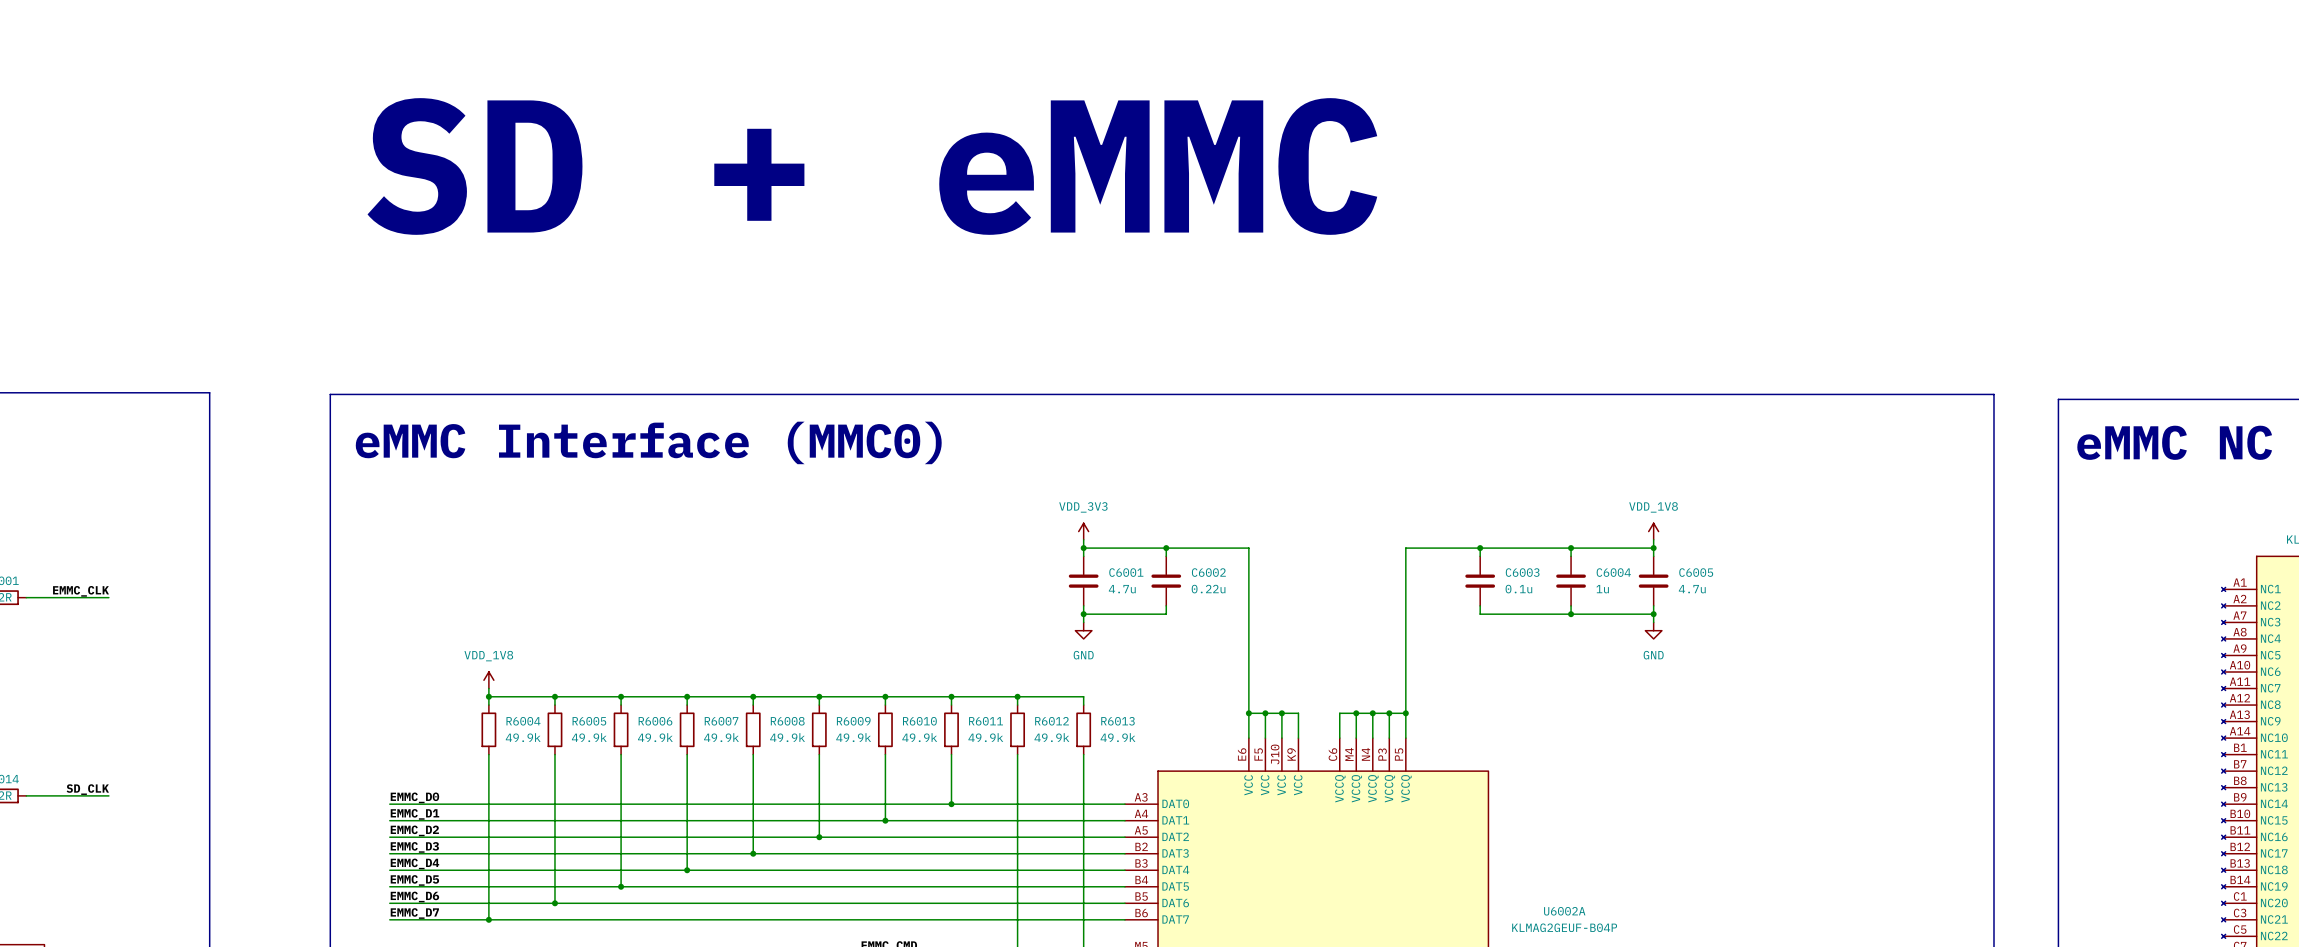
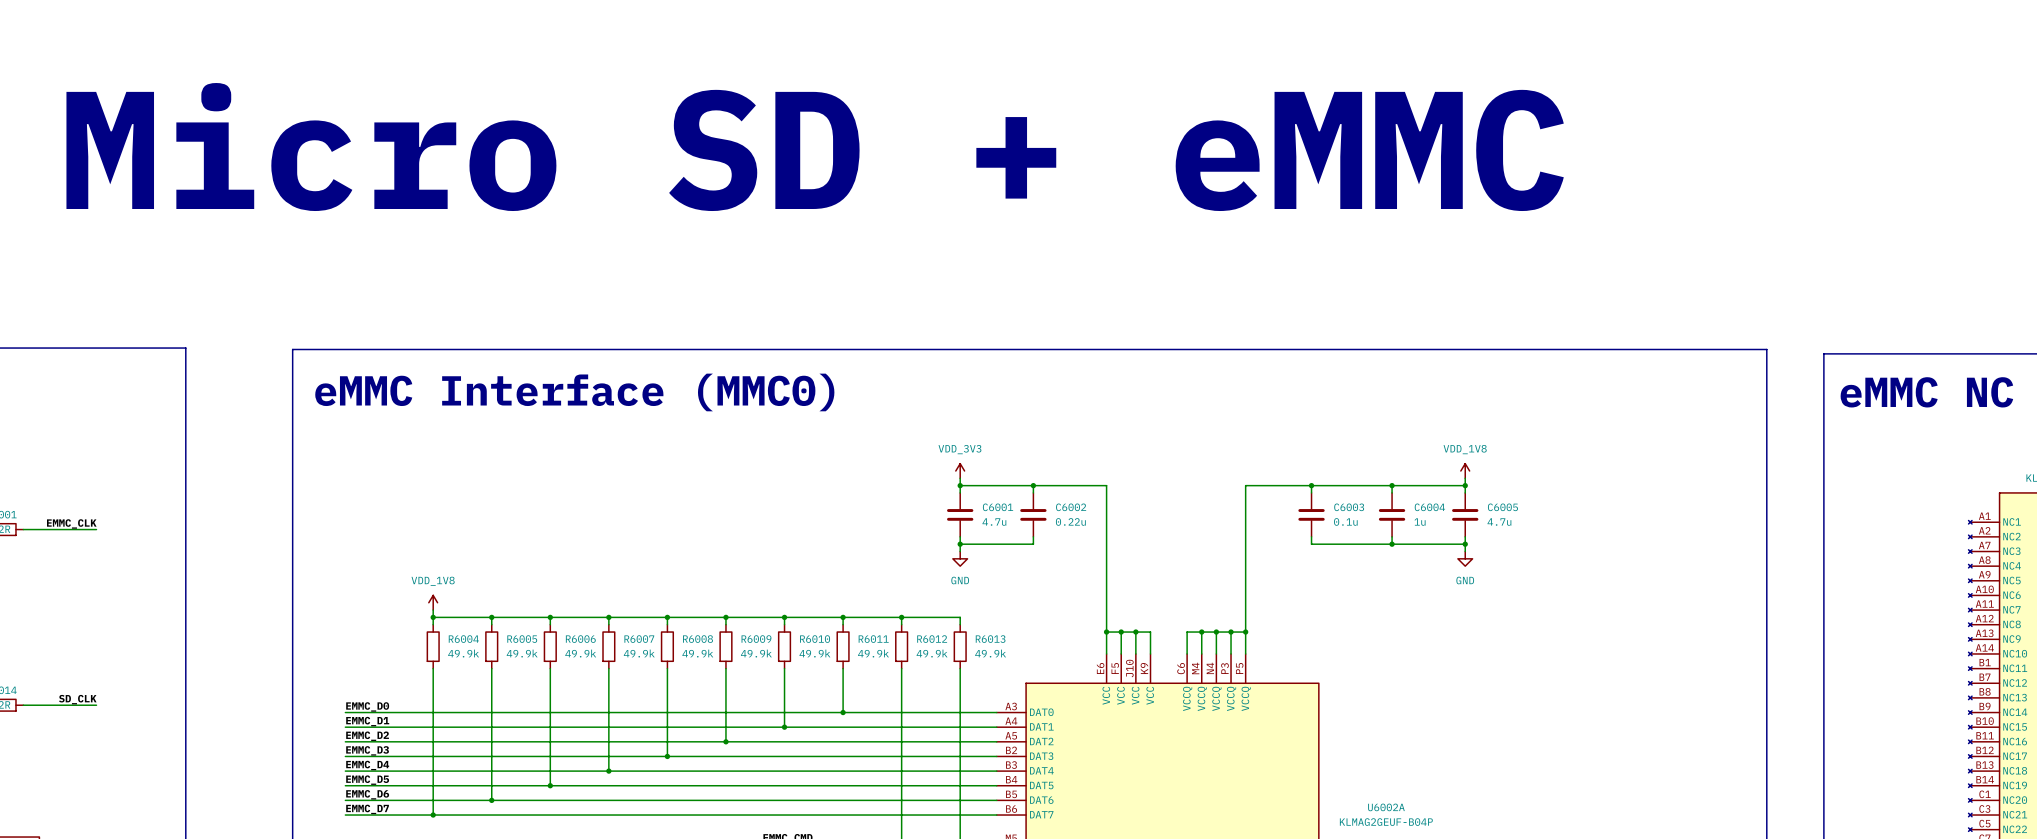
text: none -> Micro SD + eMMC (815, 147)
text: SD + eMMC (872, 166) -> none

